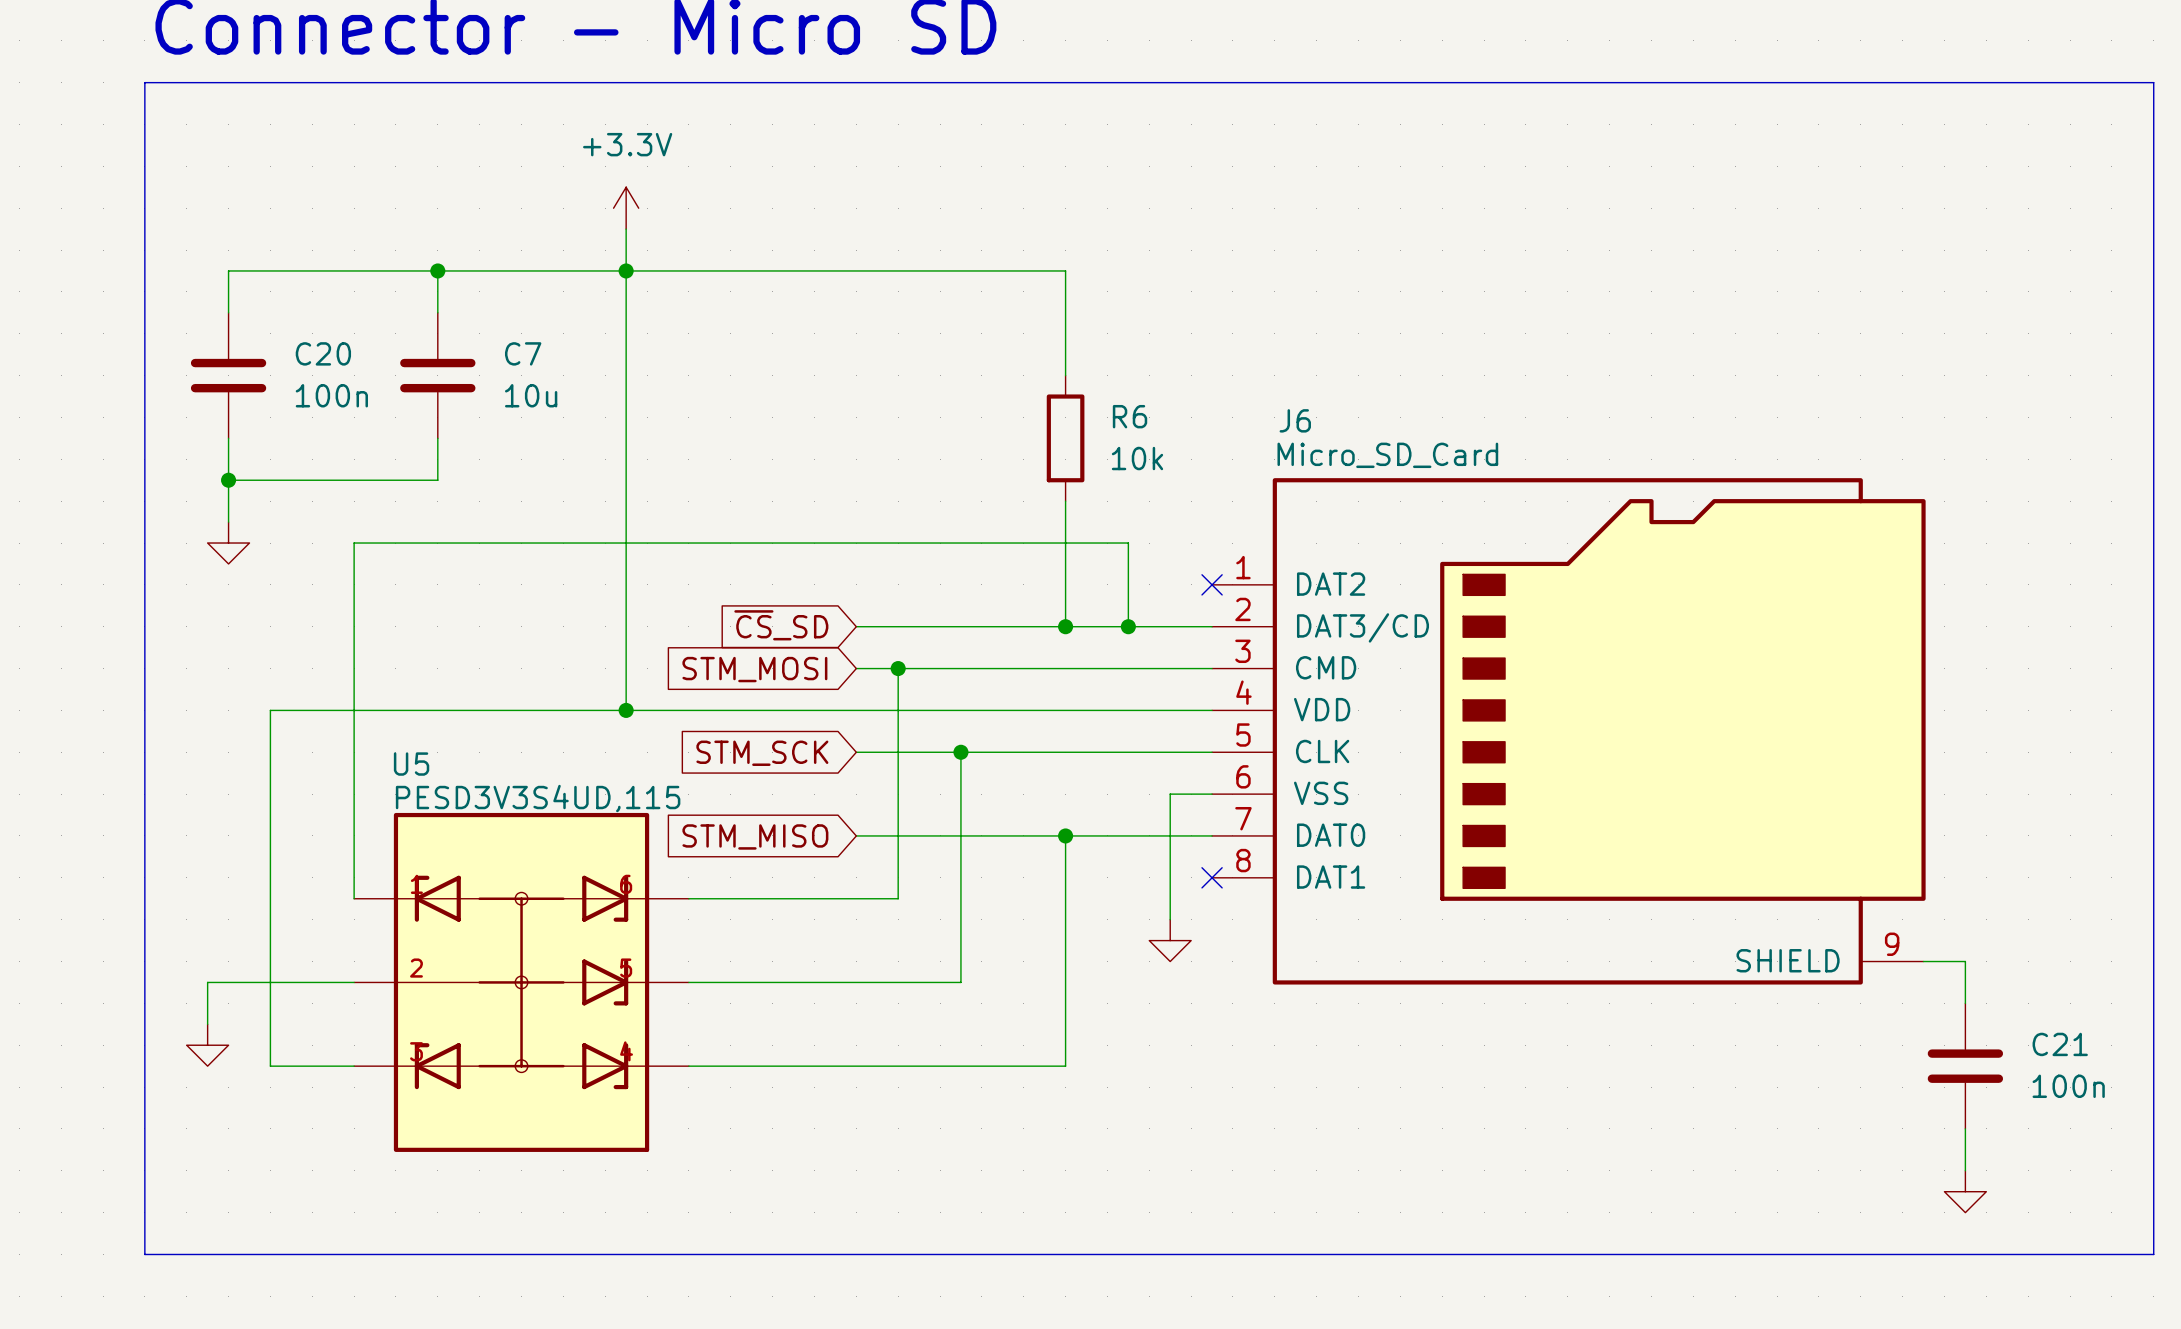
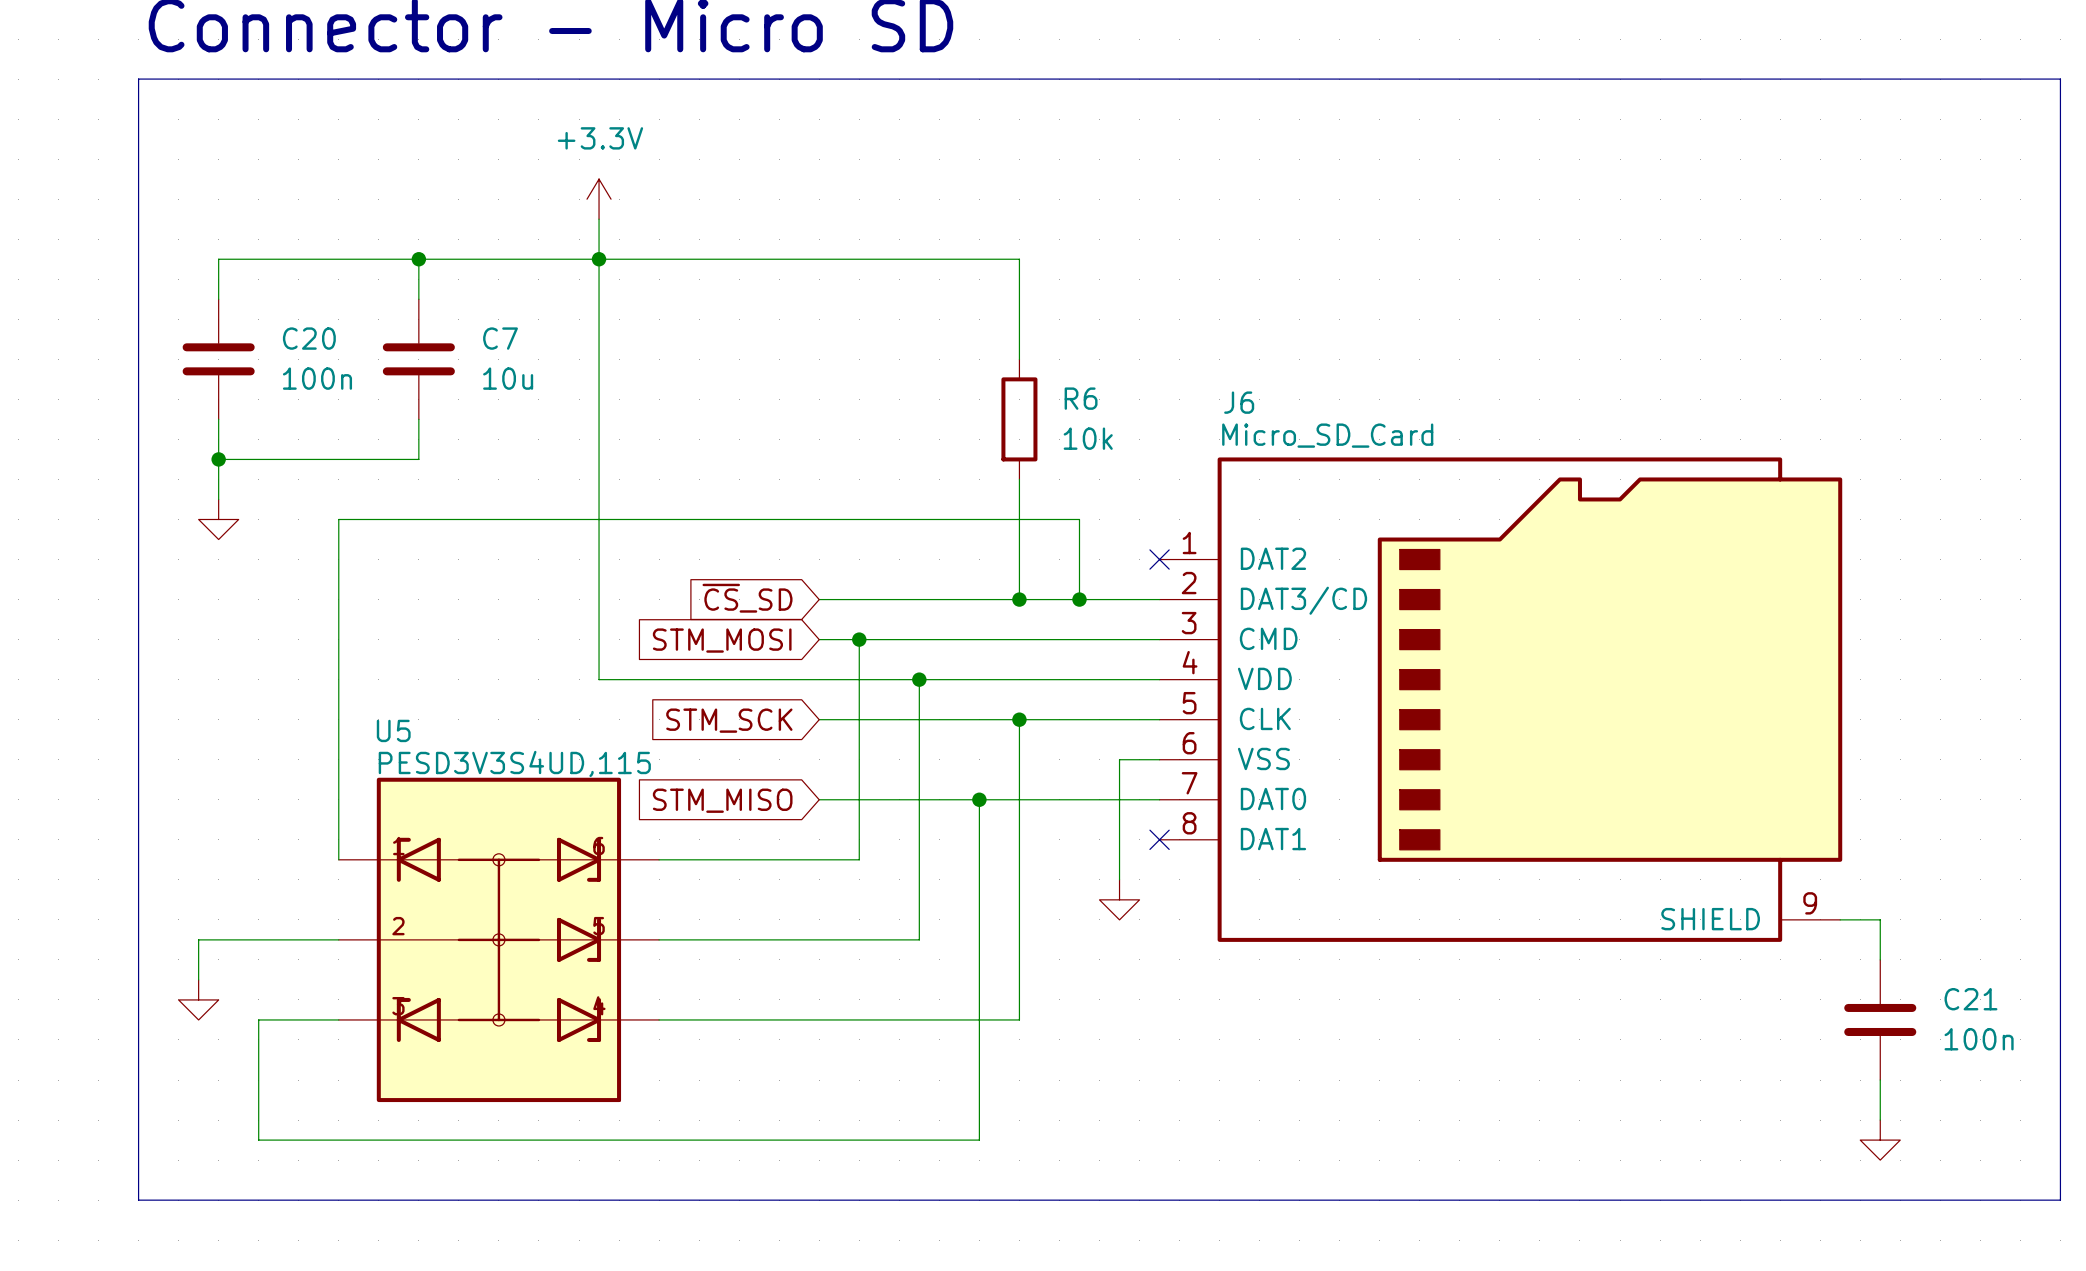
wire: (626, 710) (270, 710) (270, 1066) -> (979, 799) (979, 1140) (258, 1140) (258, 1019)
junction: (626, 710) -> none
wire: none -> (919, 679) (919, 719)
junction position: (960, 752) -> (919, 679)
wire: none -> (1019, 719) (1019, 799)
junction: none -> (1019, 719)
junction: none -> (979, 799)
junction: (1065, 835) -> none

